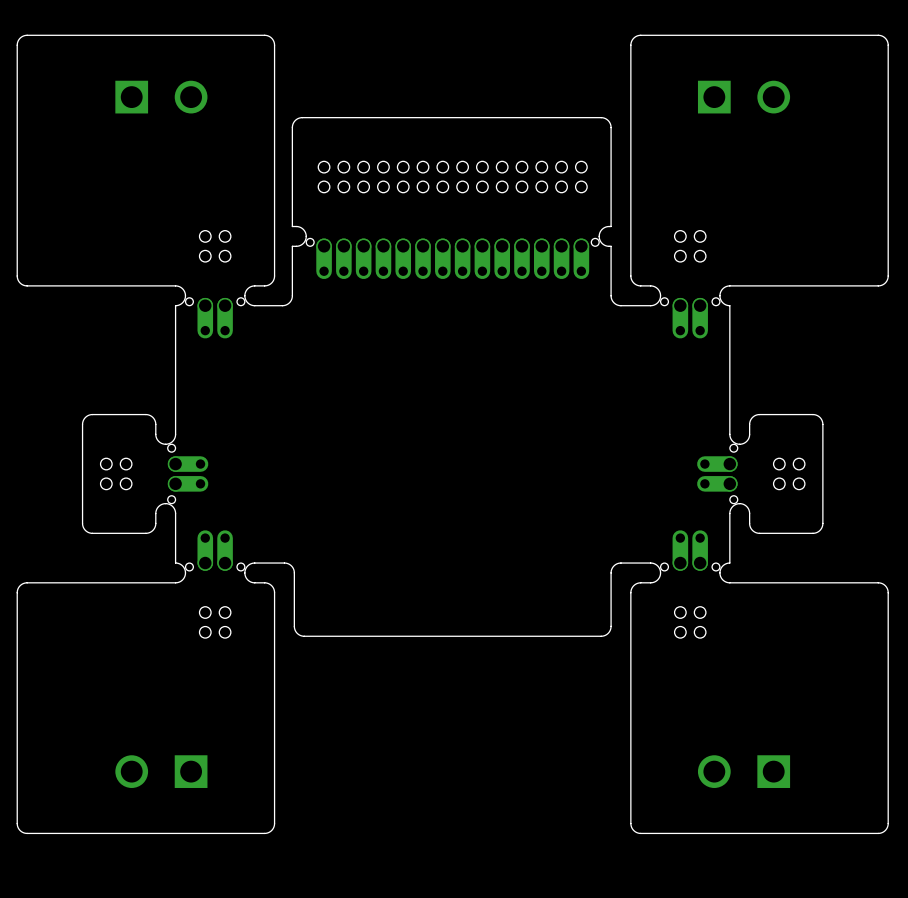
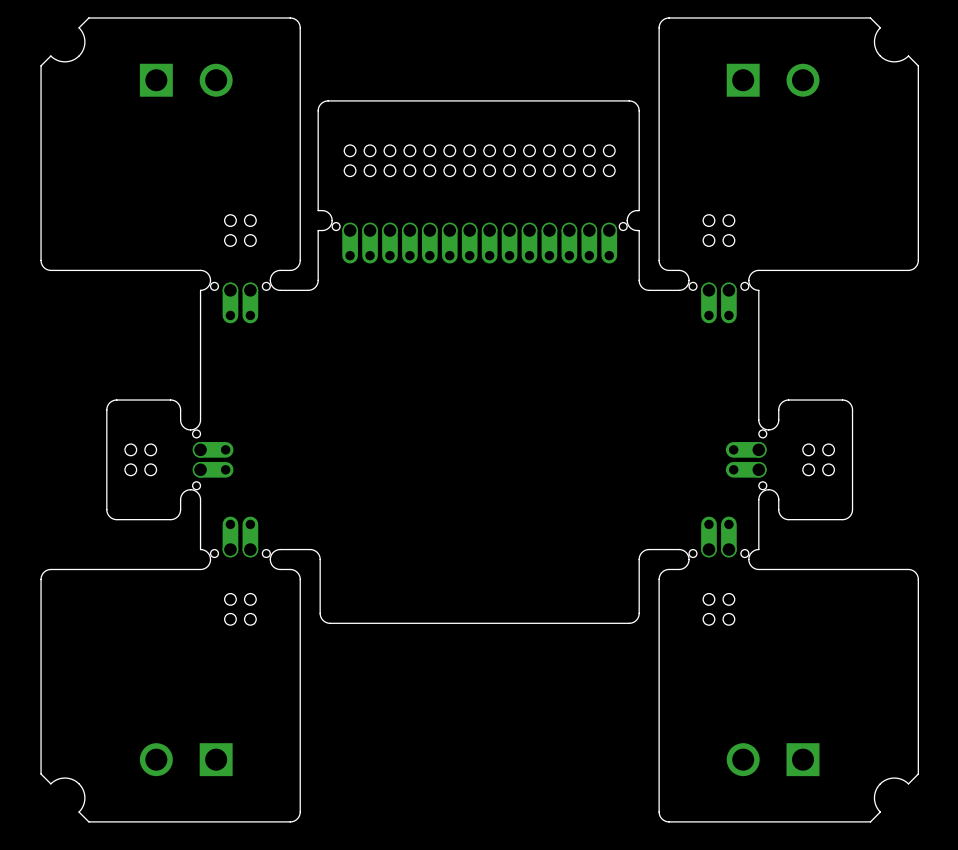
board edge: (64, 35) (26, 35) (20, 38) (17, 44) (17, 82) -> (88, 17) (79, 27) (84, 41) (79, 56) (72, 60) (64, 61) (57, 60) (50, 56) (41, 65)
board edge: (840, 35) (879, 35) (885, 38) (888, 44) (888, 82) -> (870, 17) (880, 27) (875, 34) (874, 41) (875, 49) (880, 56) (894, 61) (908, 56) (918, 65)
board edge: (17, 785) (17, 824) (20, 830) (26, 833) (64, 833) -> (41, 774) (50, 783) (64, 778) (79, 783) (83, 790) (84, 797) (83, 805) (79, 812) (88, 821)
board edge: (888, 785) (888, 824) (885, 830) (879, 833) (840, 833) -> (918, 774) (908, 783) (902, 779) (894, 778) (886, 779) (880, 783) (874, 797) (880, 812) (870, 821)

